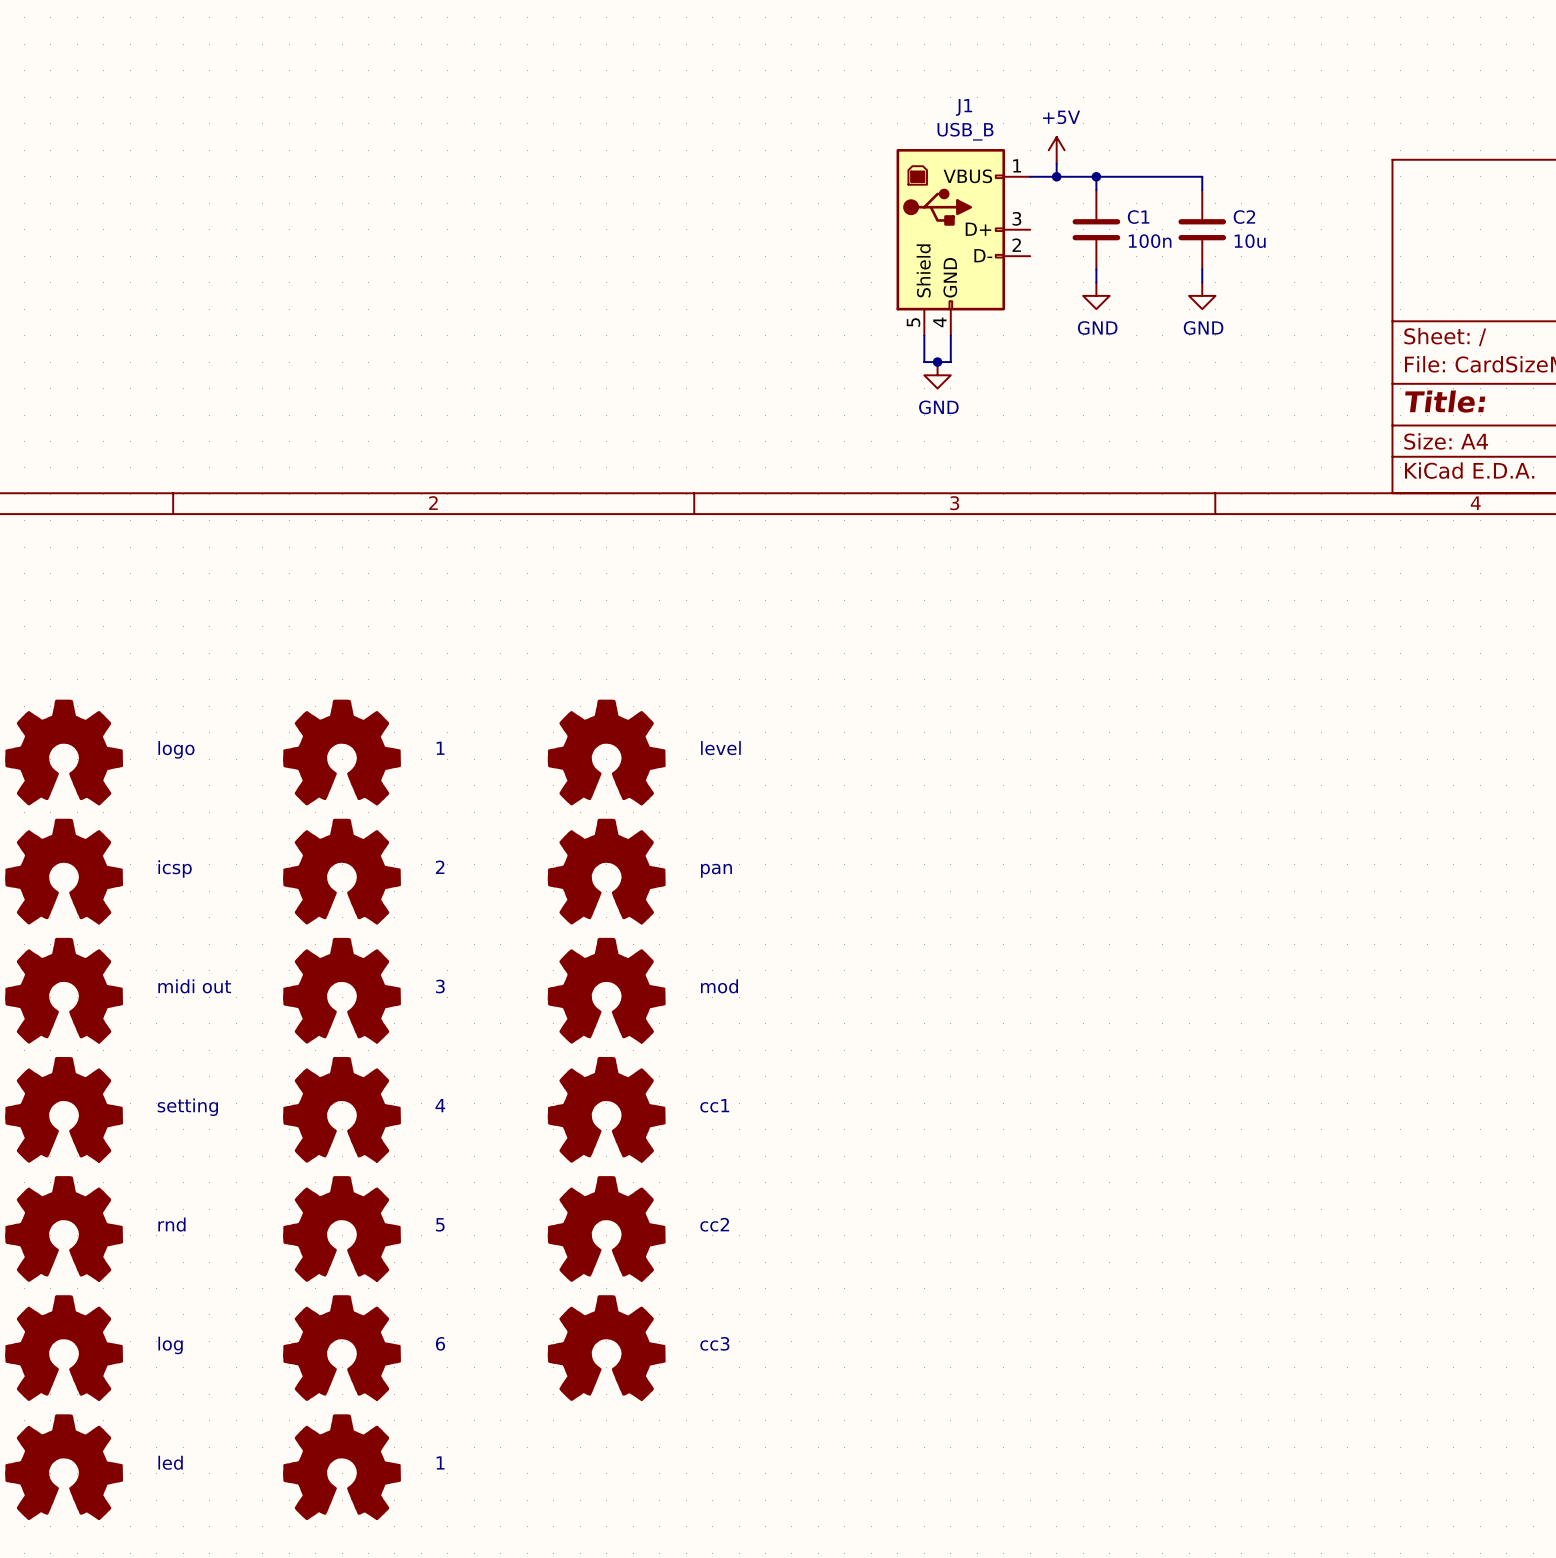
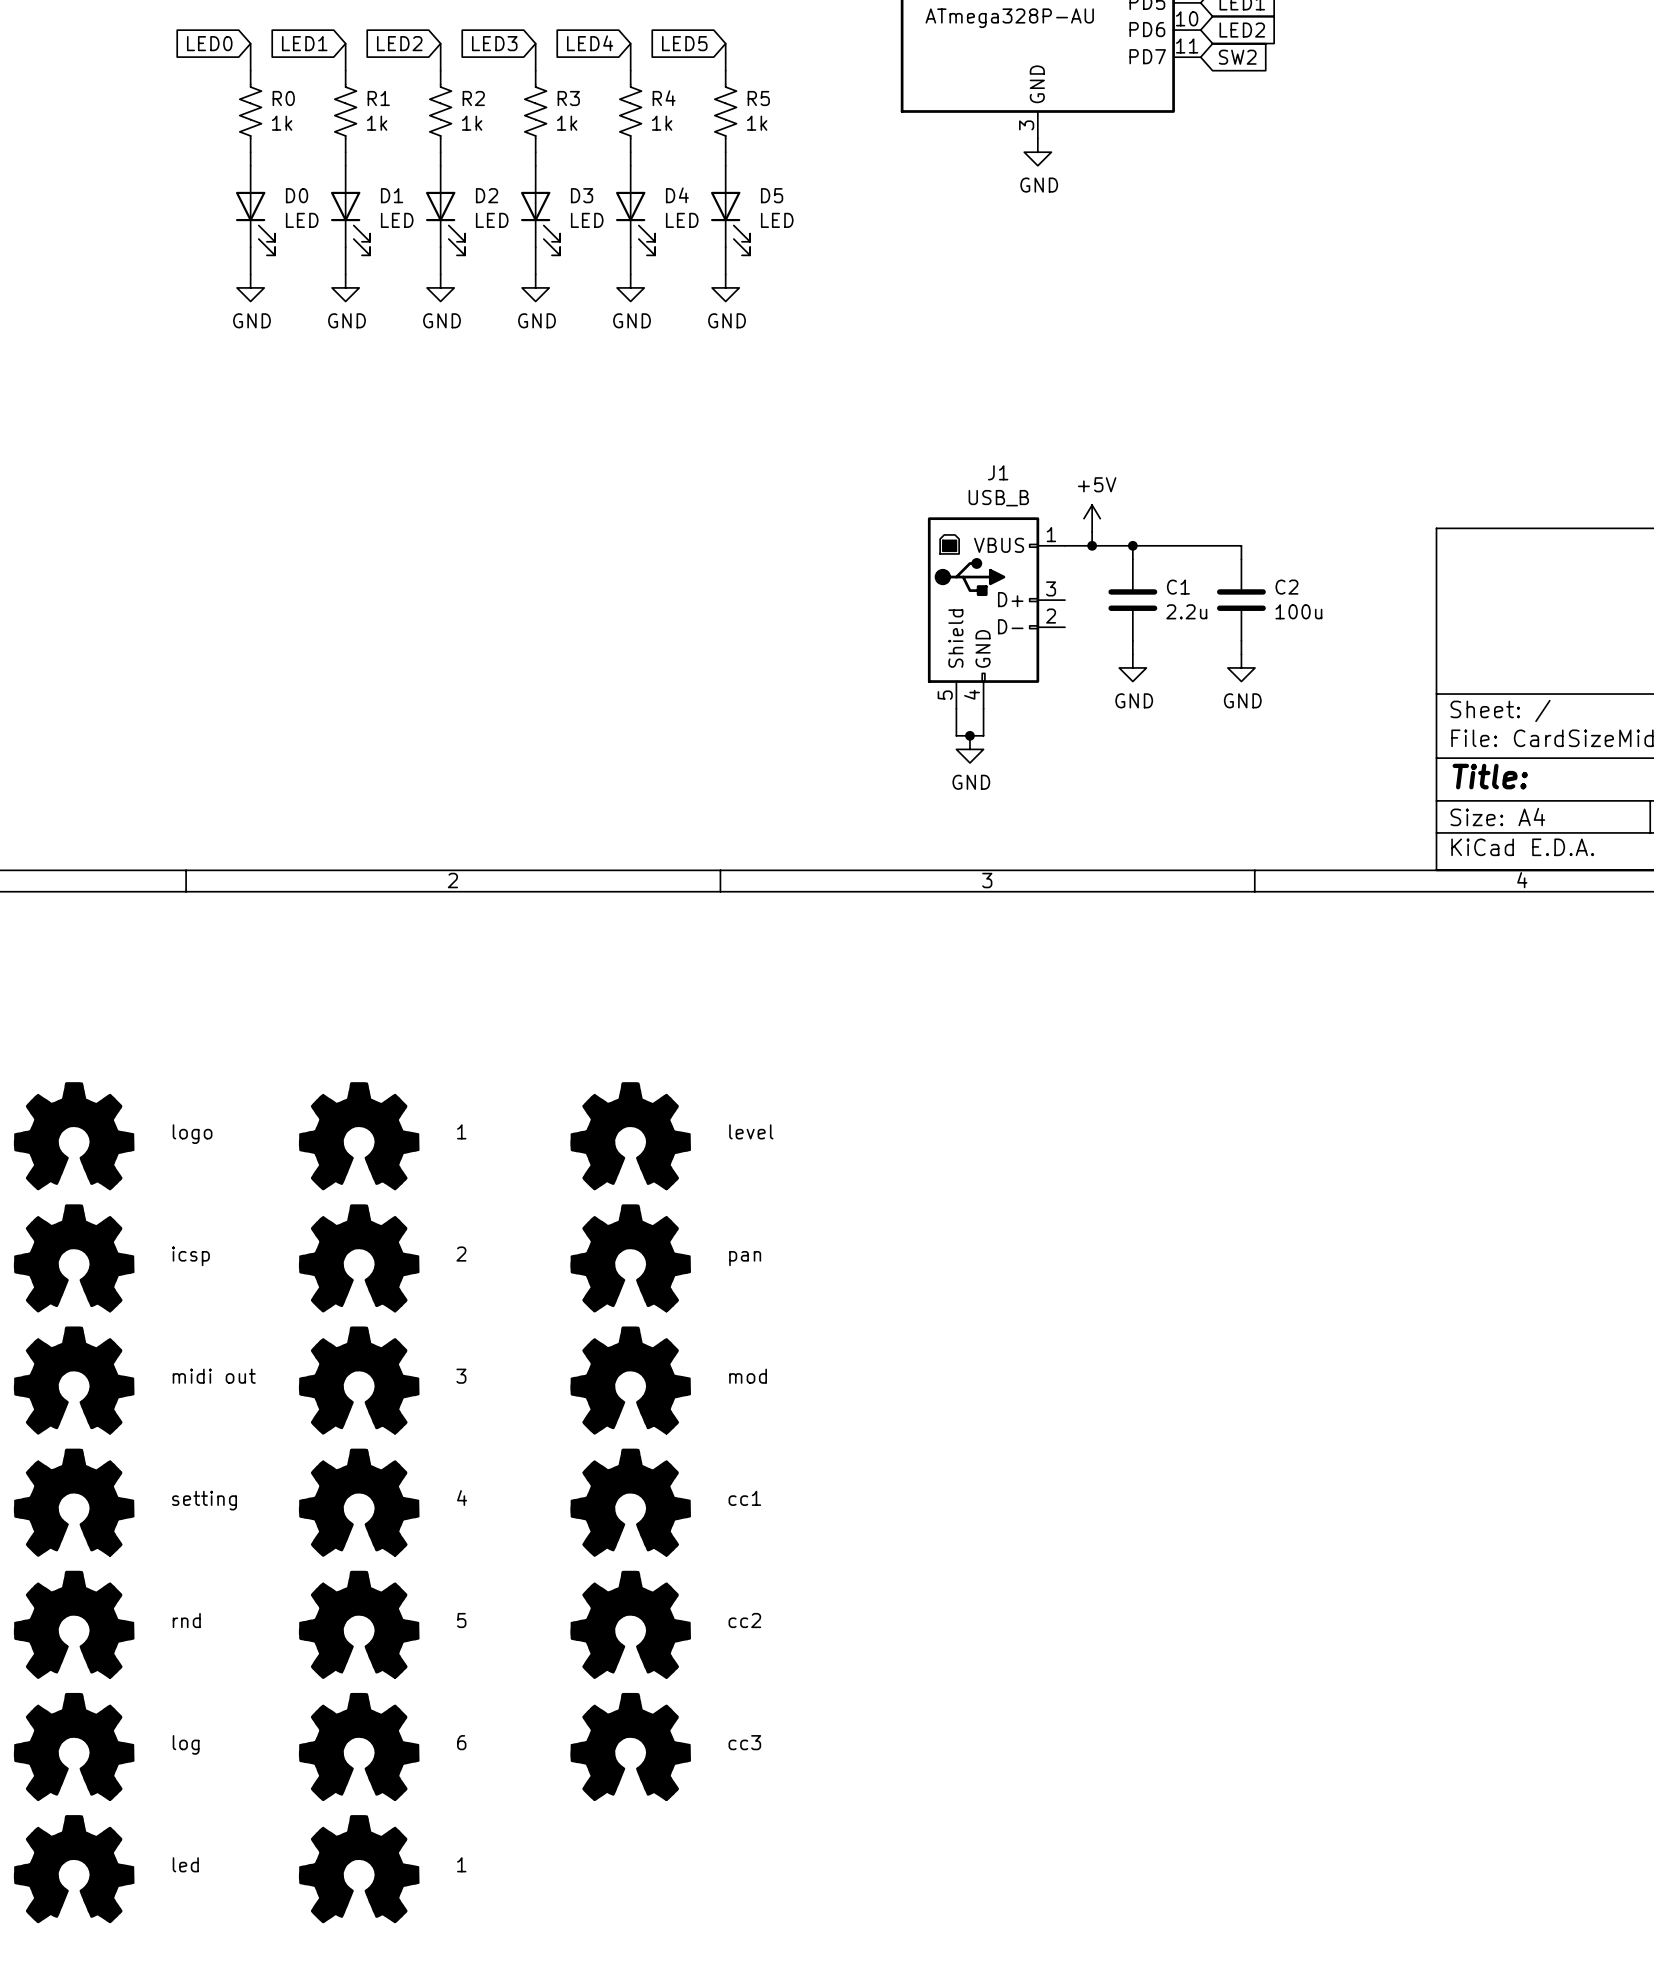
C1 value: 100n (1150, 241) -> 2.2u (1186, 611)
C2 value: 10u (1250, 241) -> 100u (1298, 611)

